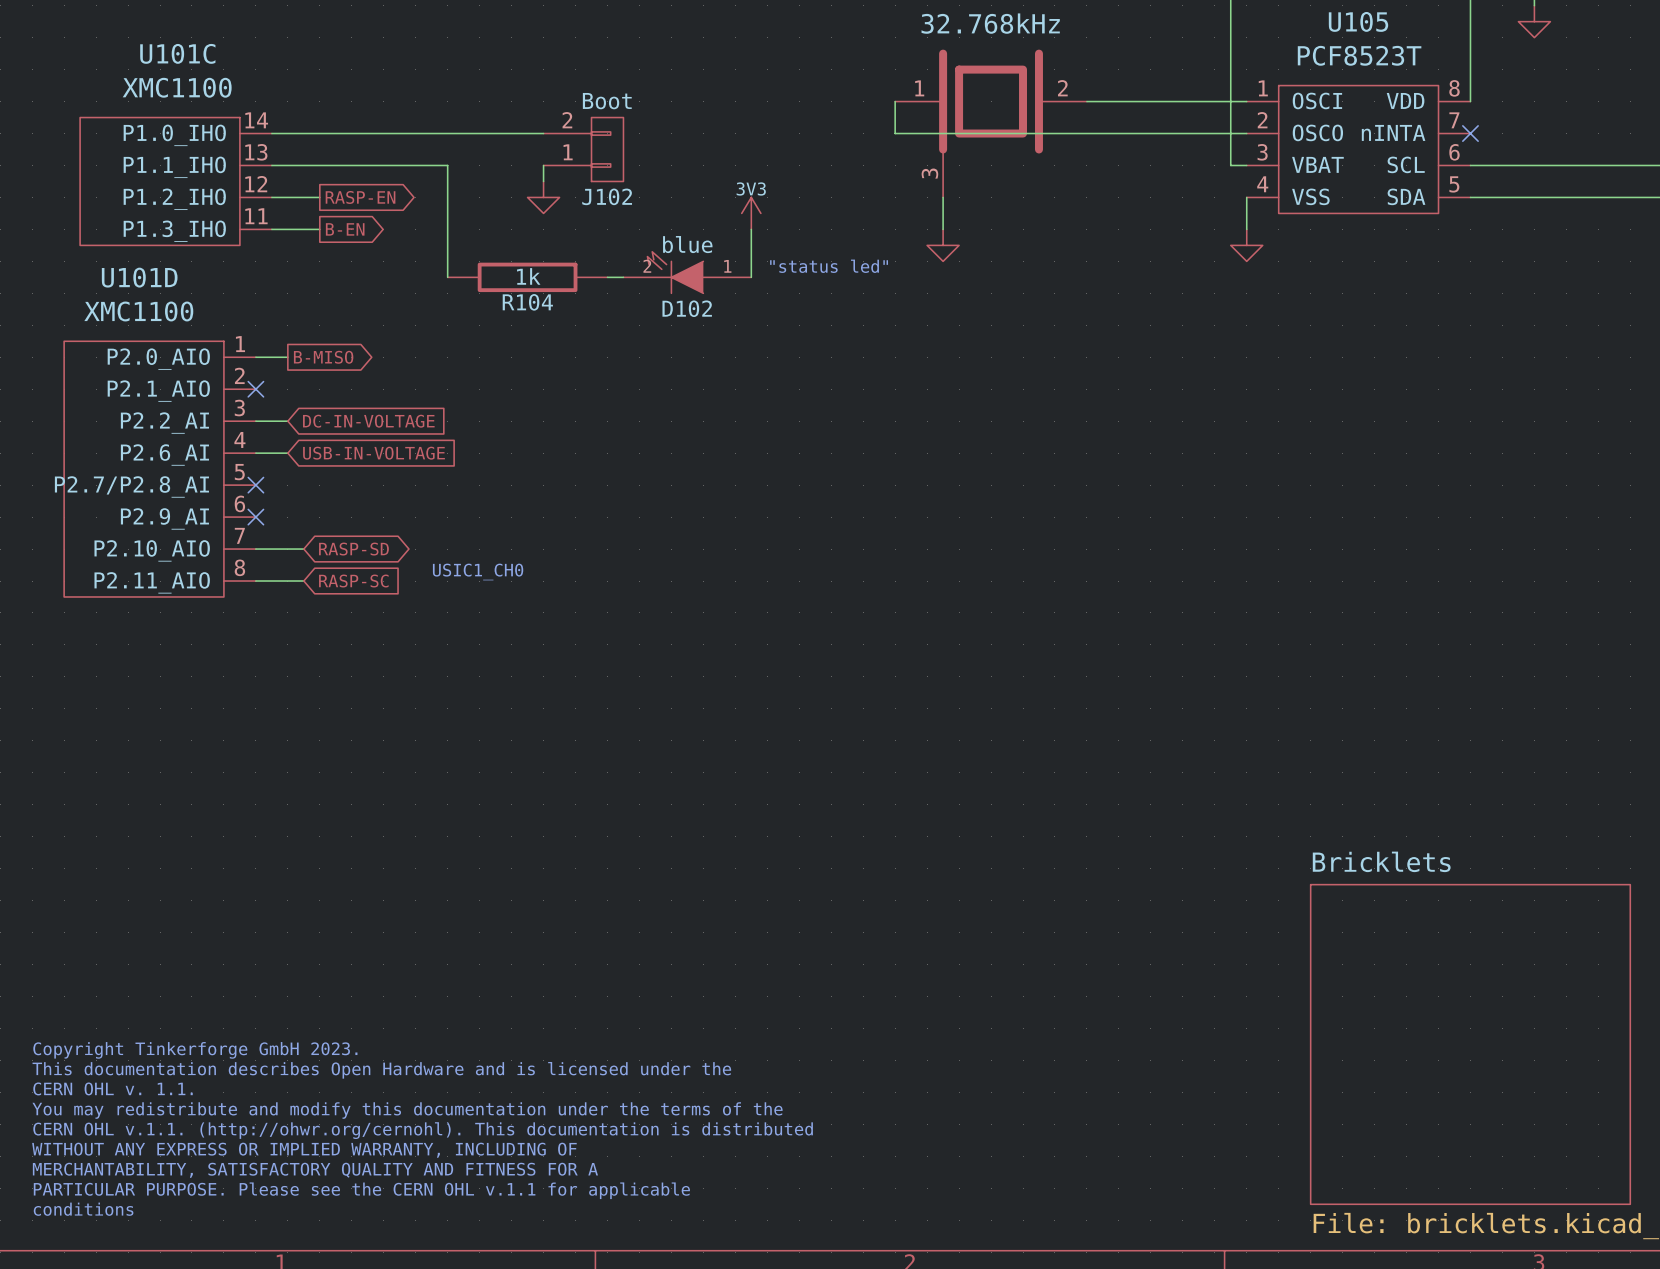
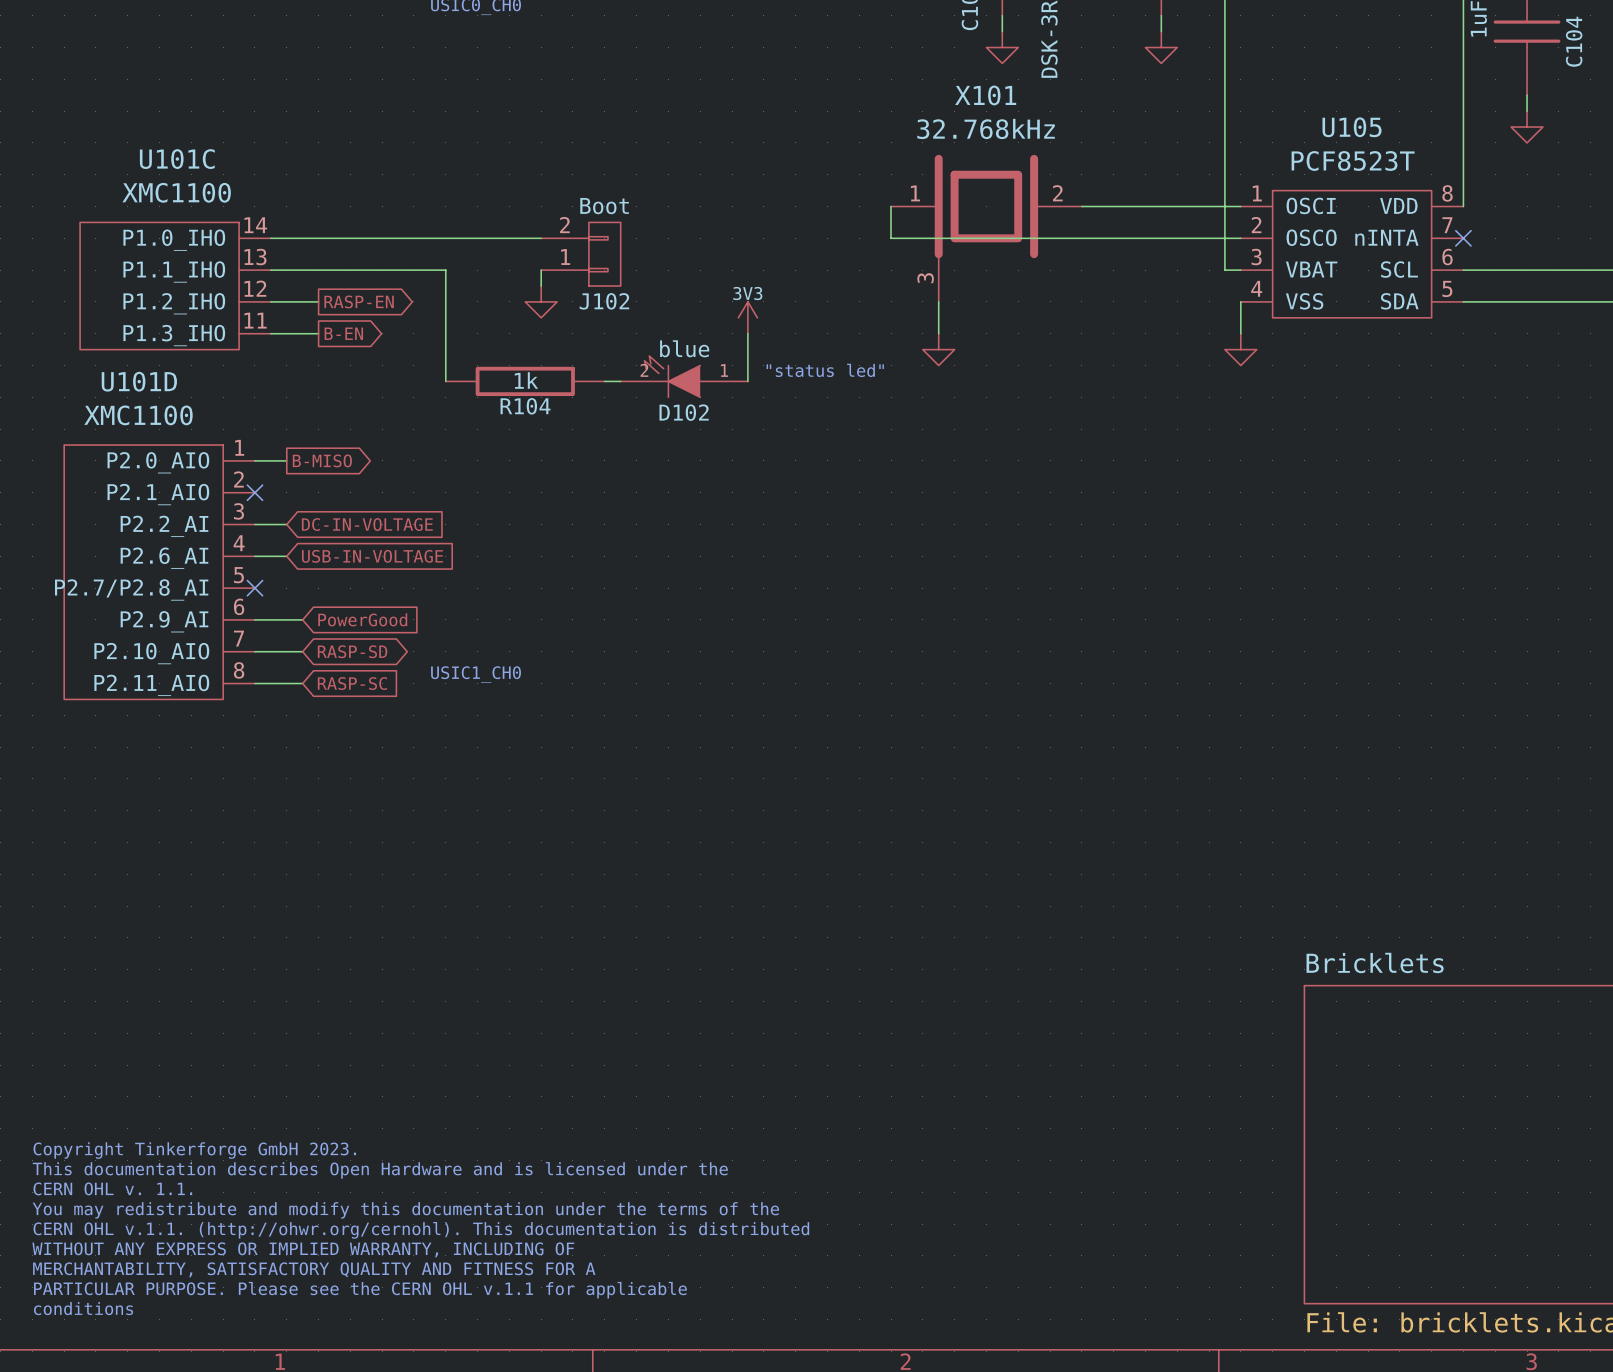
global label: none -> PowerGood (362, 619)
wire: none -> (254, 619) (302, 619)
no-connect mark: (255, 517) -> none

